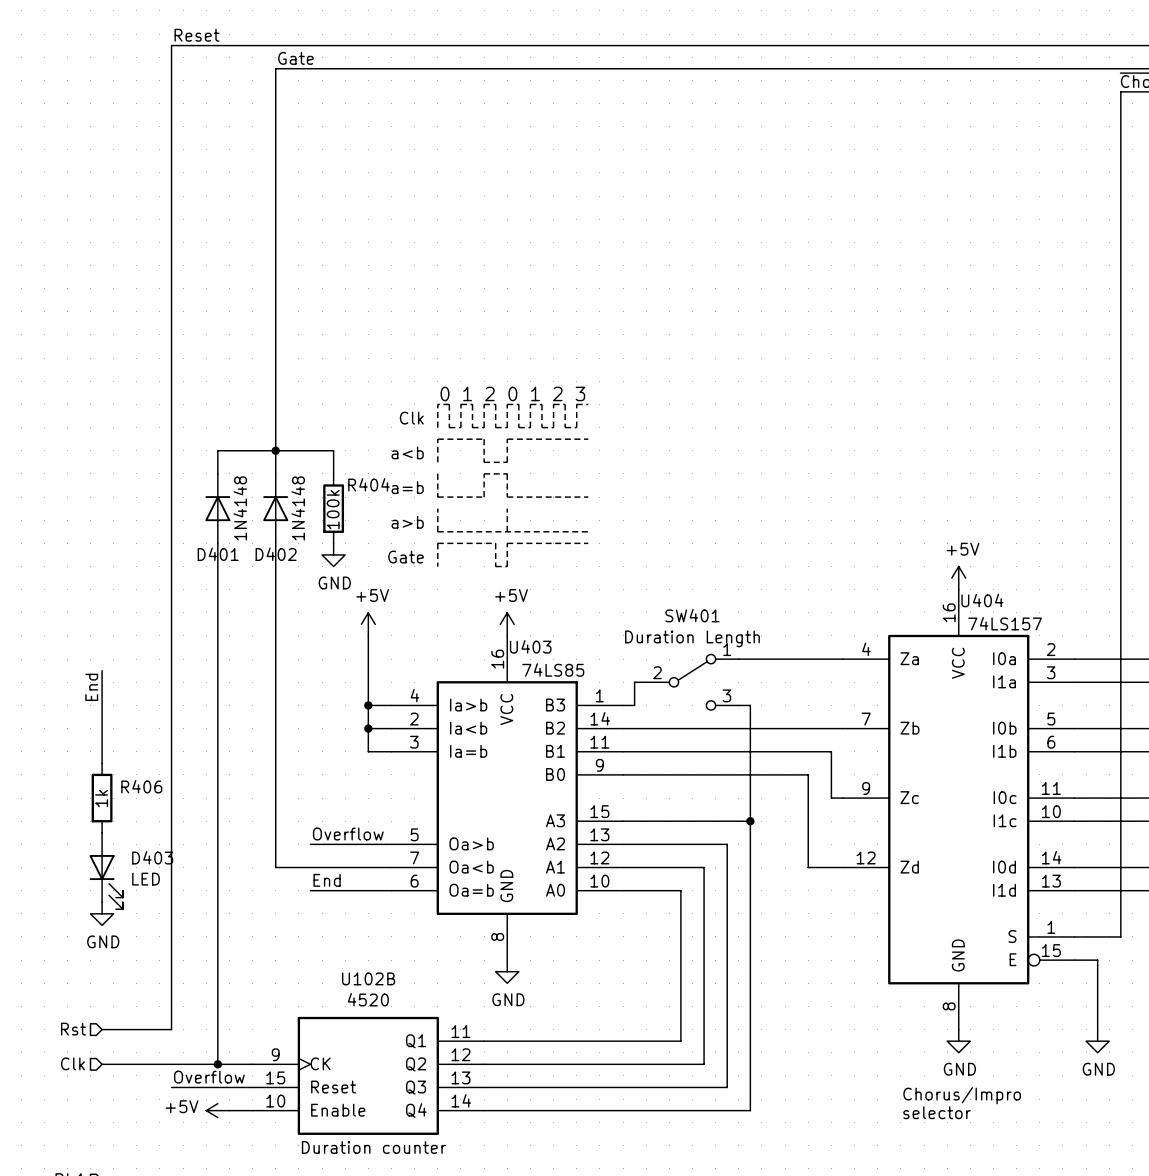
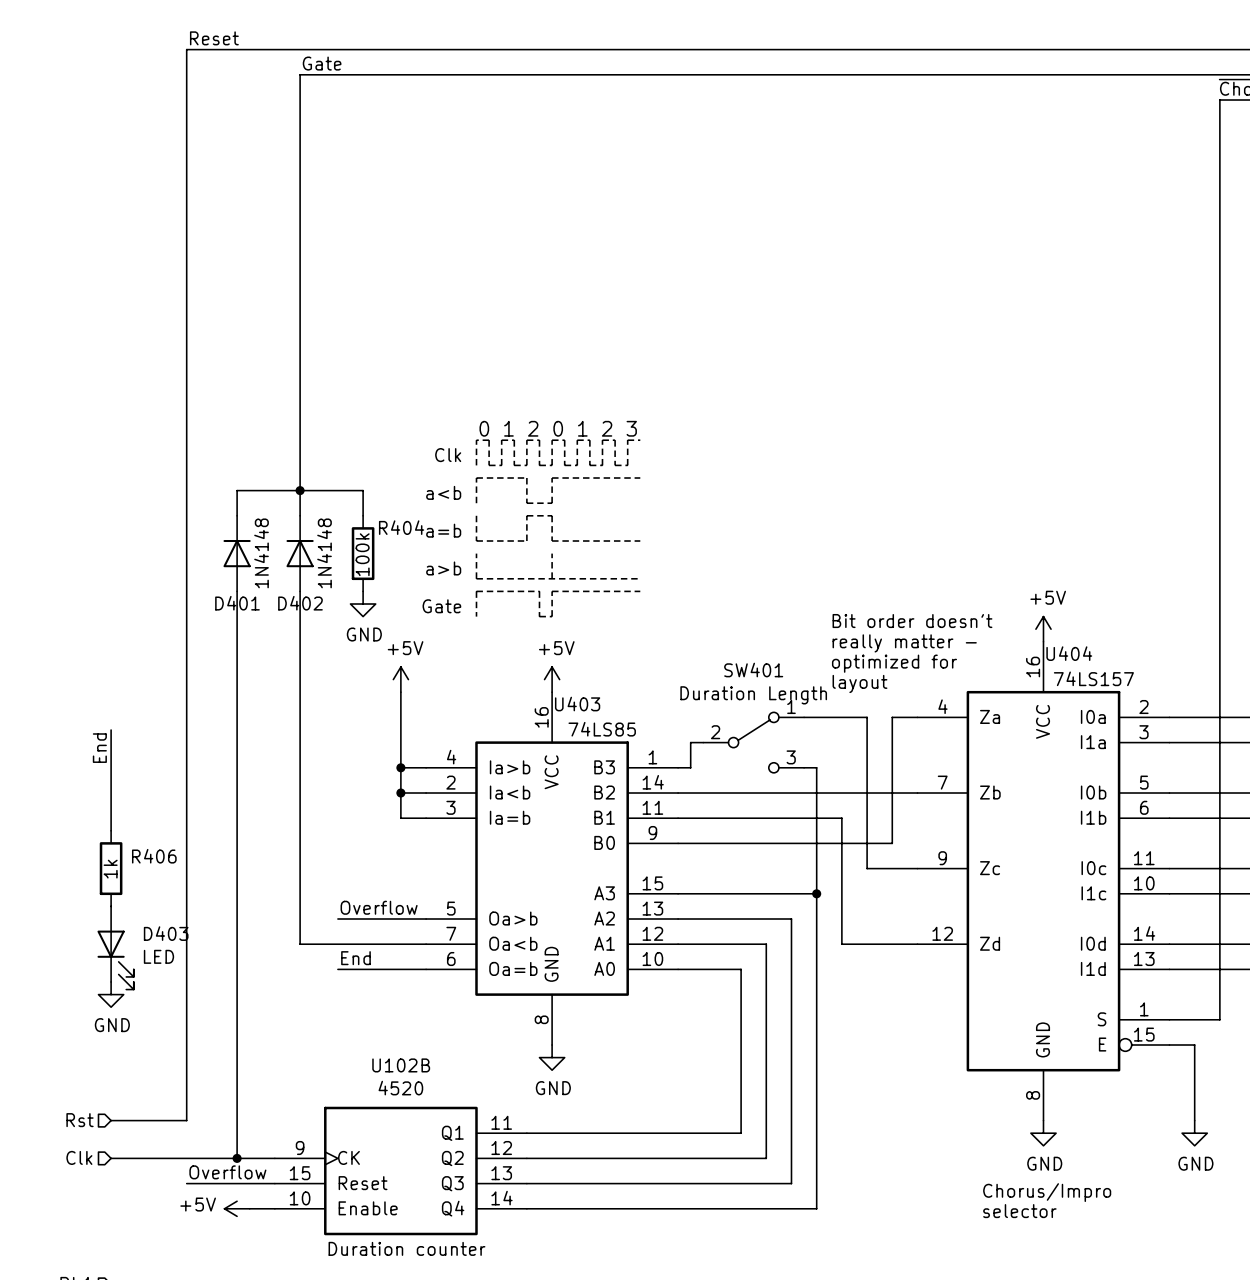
text: none -> Bit order doesn't (912, 621)
text: none -> really matter - (904, 643)
text: none -> optimized for (894, 663)
text: none -> layout (859, 683)
wire: (796, 659) (819, 659) -> (879, 843) (892, 843) (892, 717)
wire: (773, 751) (831, 751) (831, 798) -> (867, 717) (867, 868) (904, 868)
wire: (808, 774) (808, 867) -> (841, 818) (841, 944) (879, 944)

